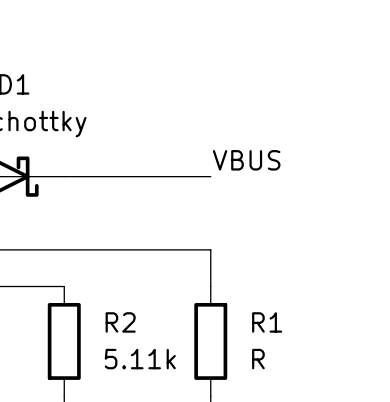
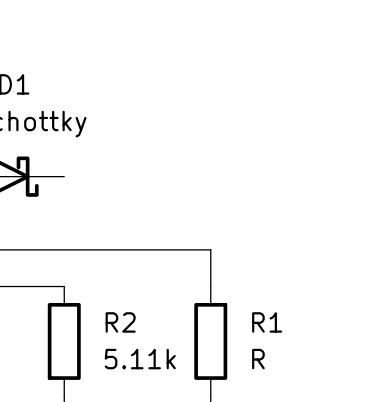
label: VBUS (246, 160) -> none
wire: (64, 176) (210, 176) -> none

